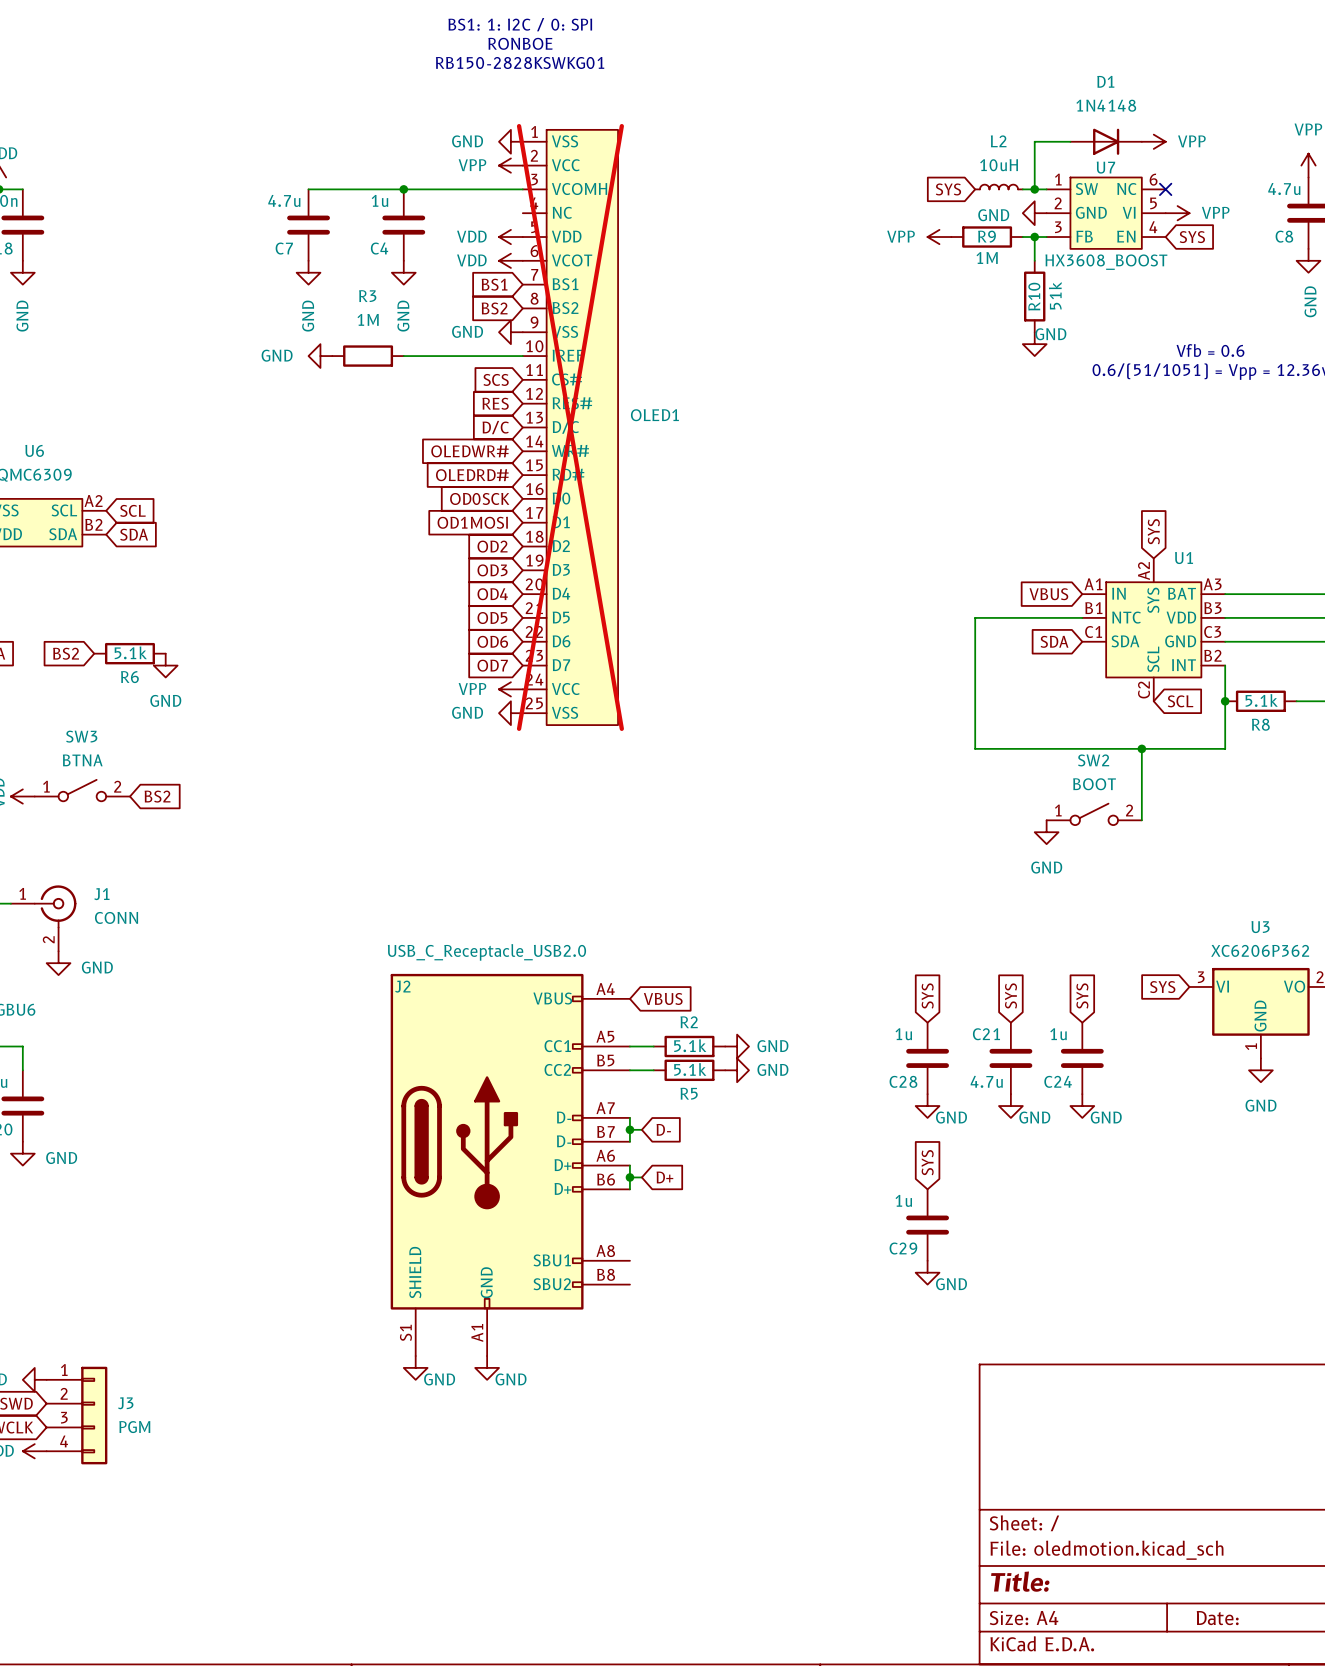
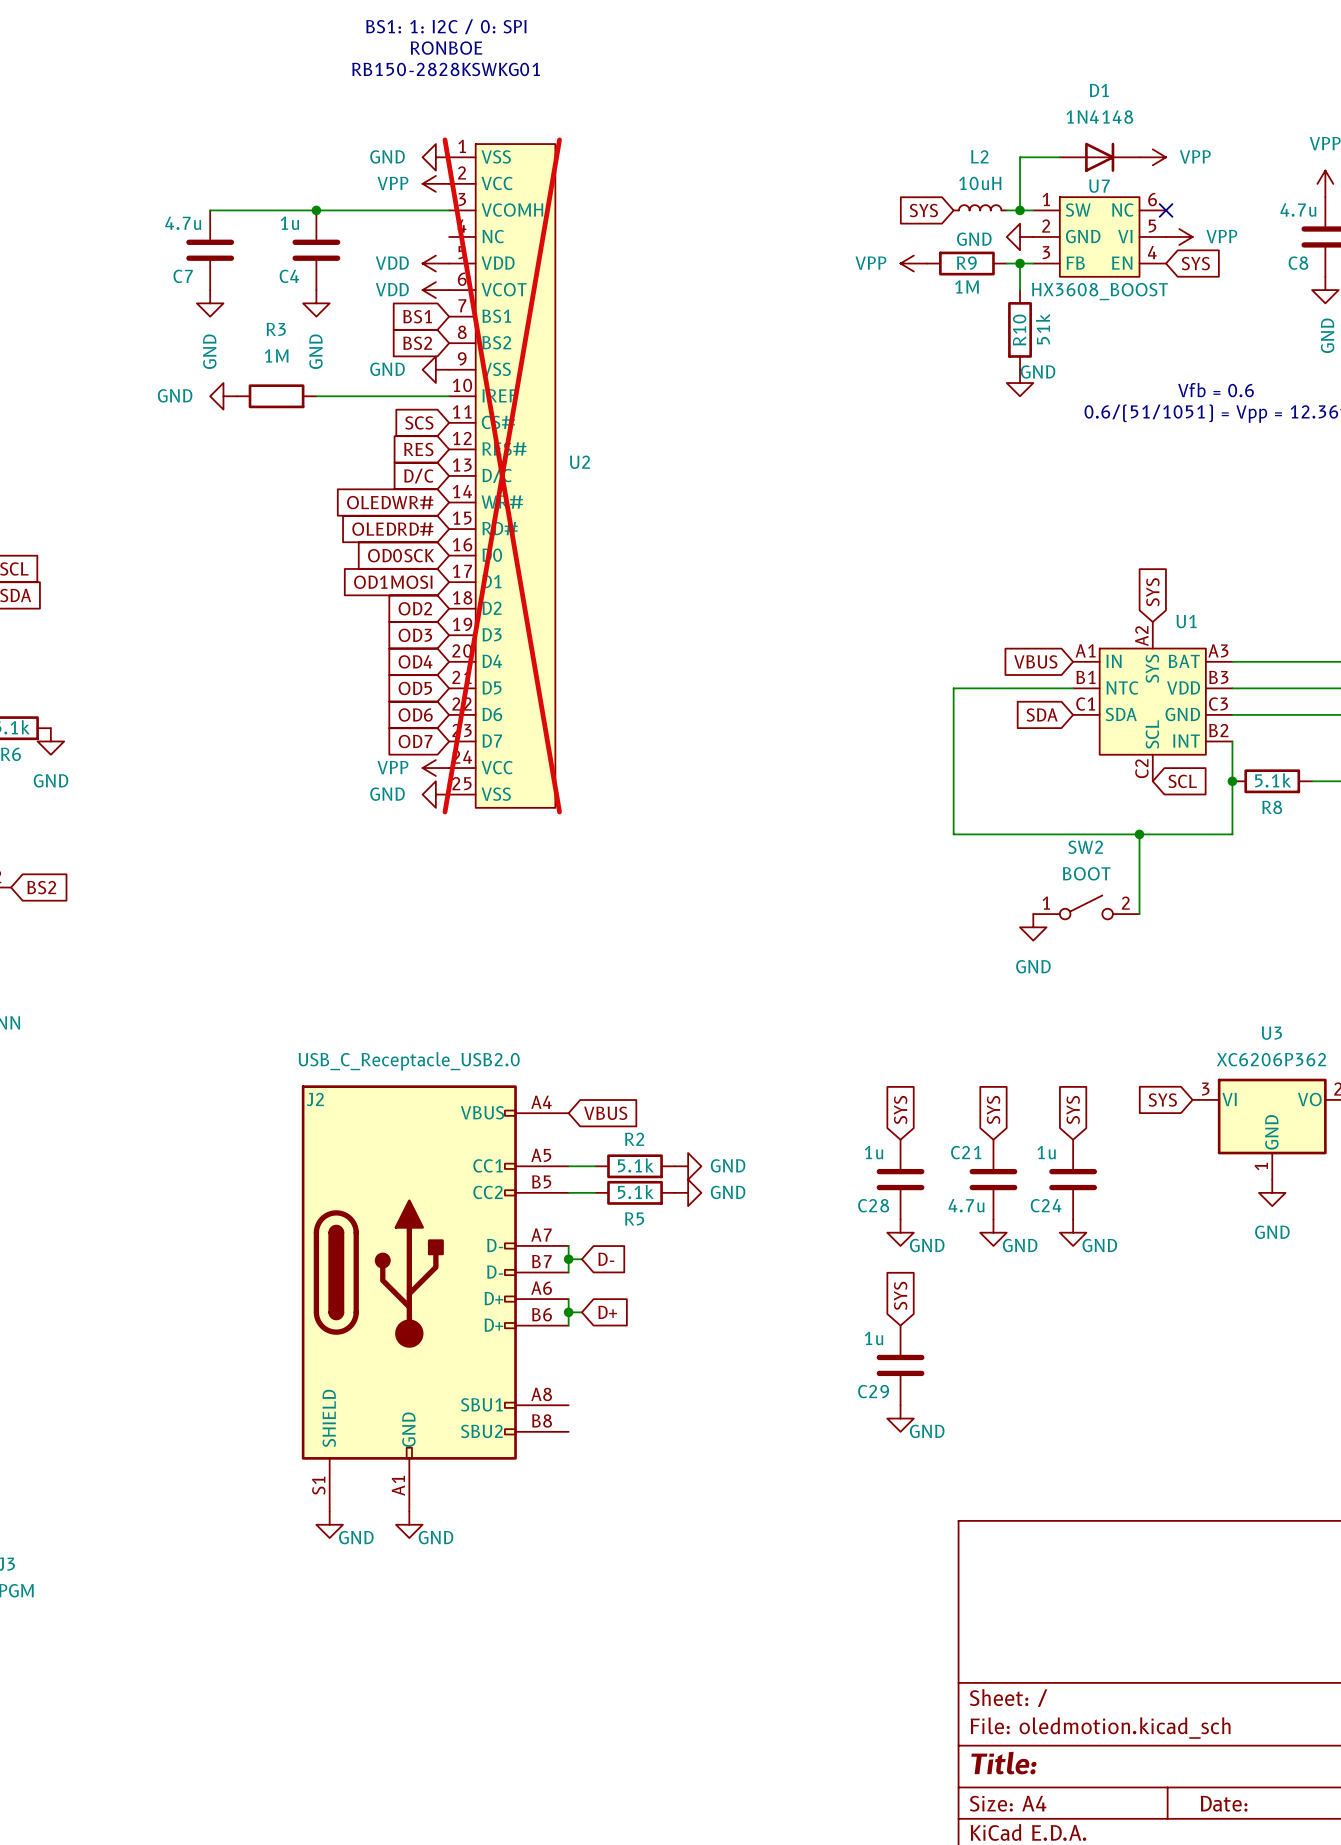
OLED1 name: OLED1 (654, 415) -> U2 (580, 462)

